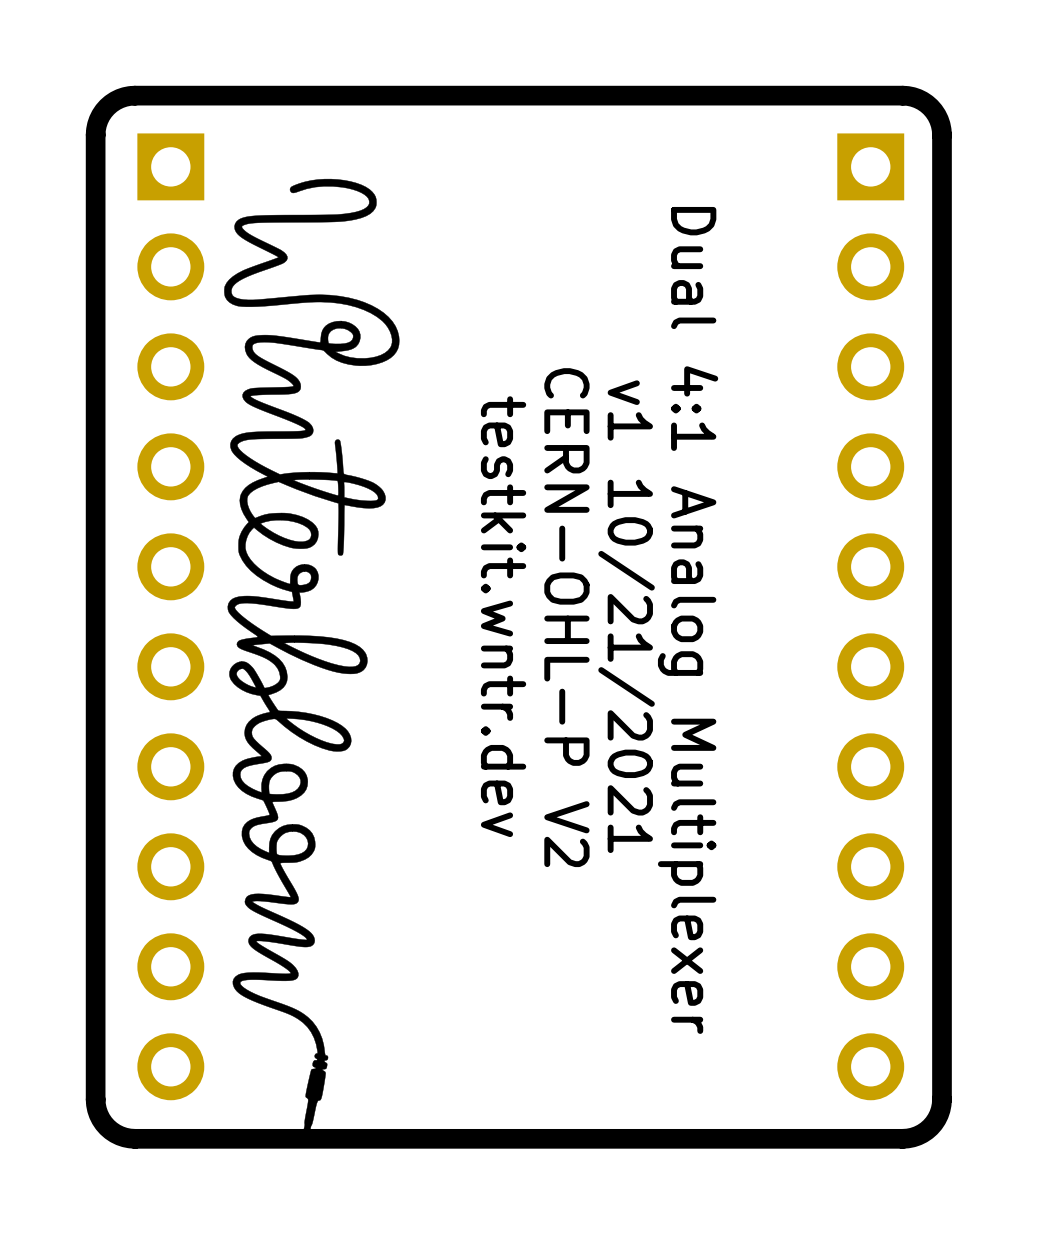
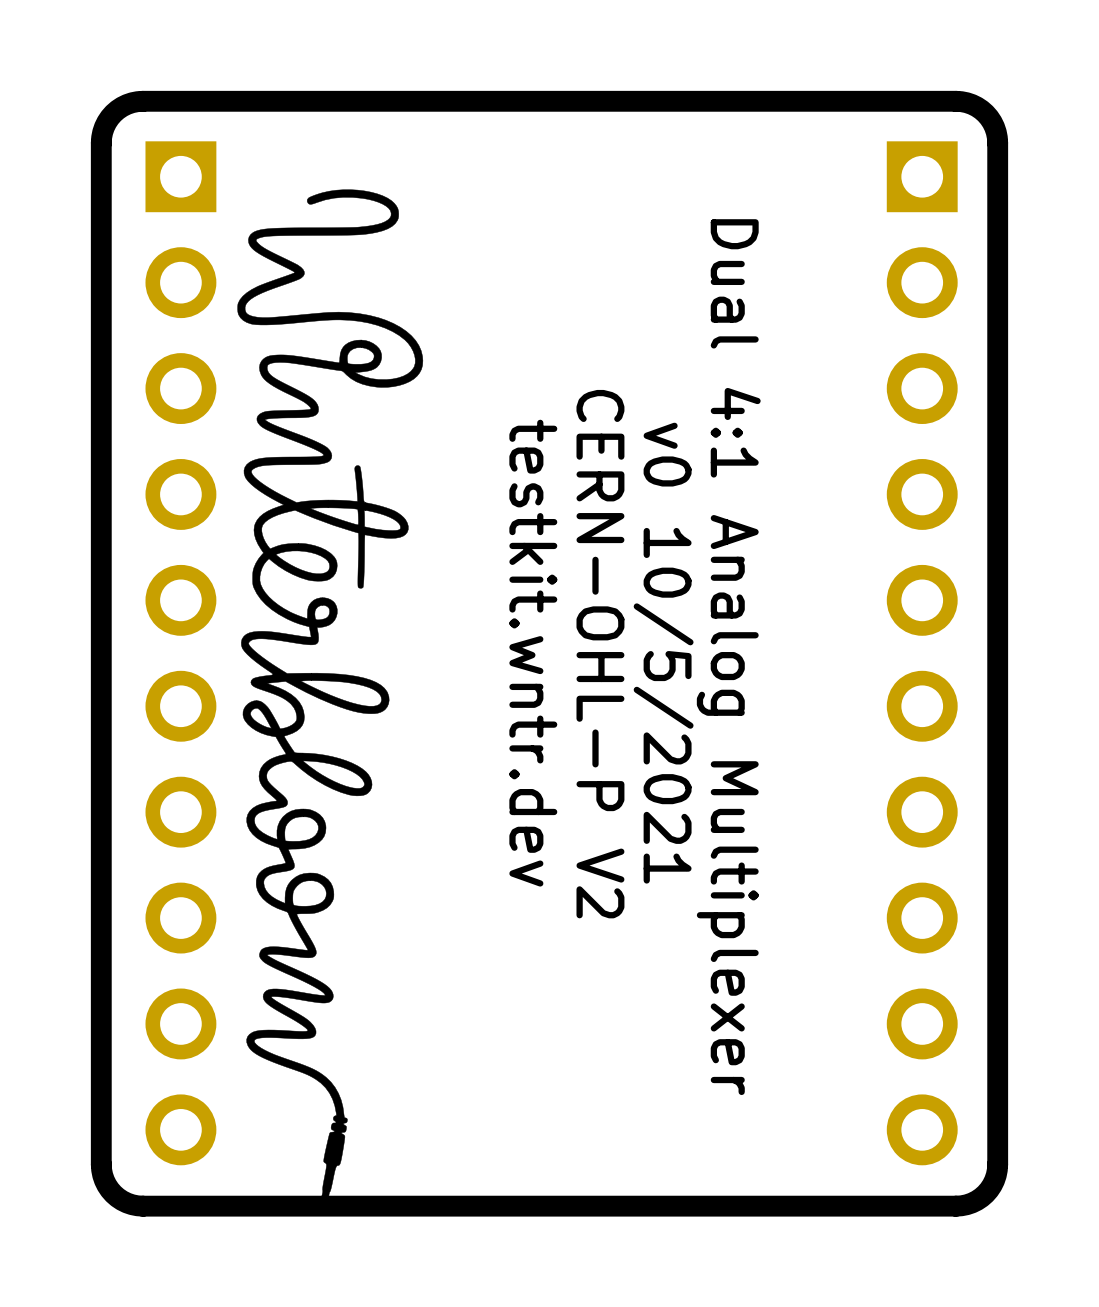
text: v1 10/21/2021 (626, 616) -> v0 10/5/2021 (663, 653)

